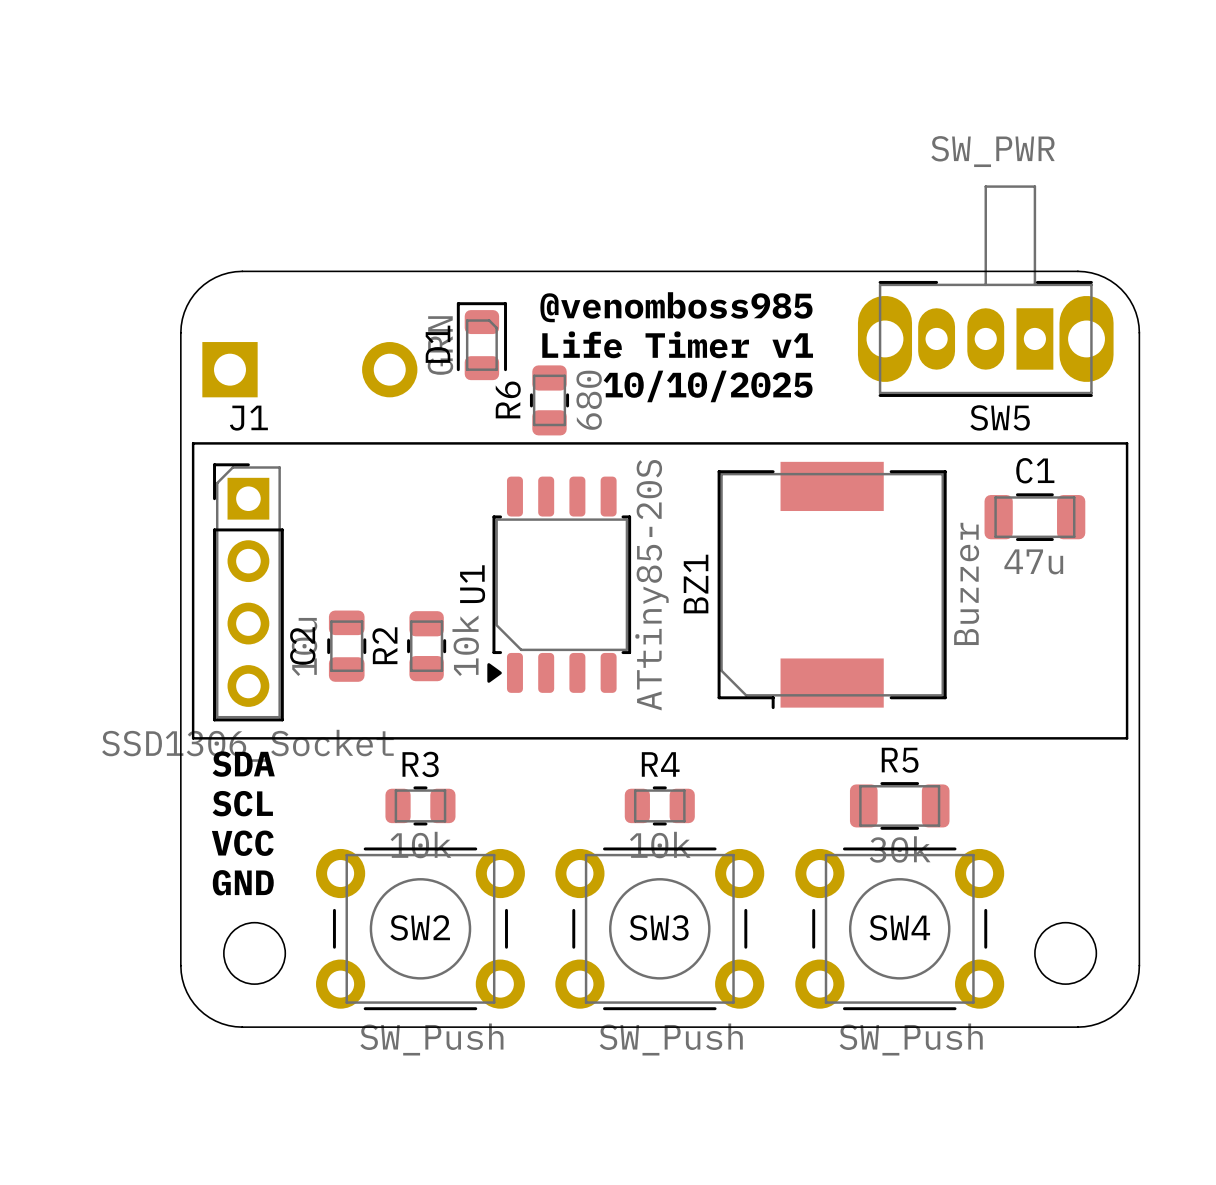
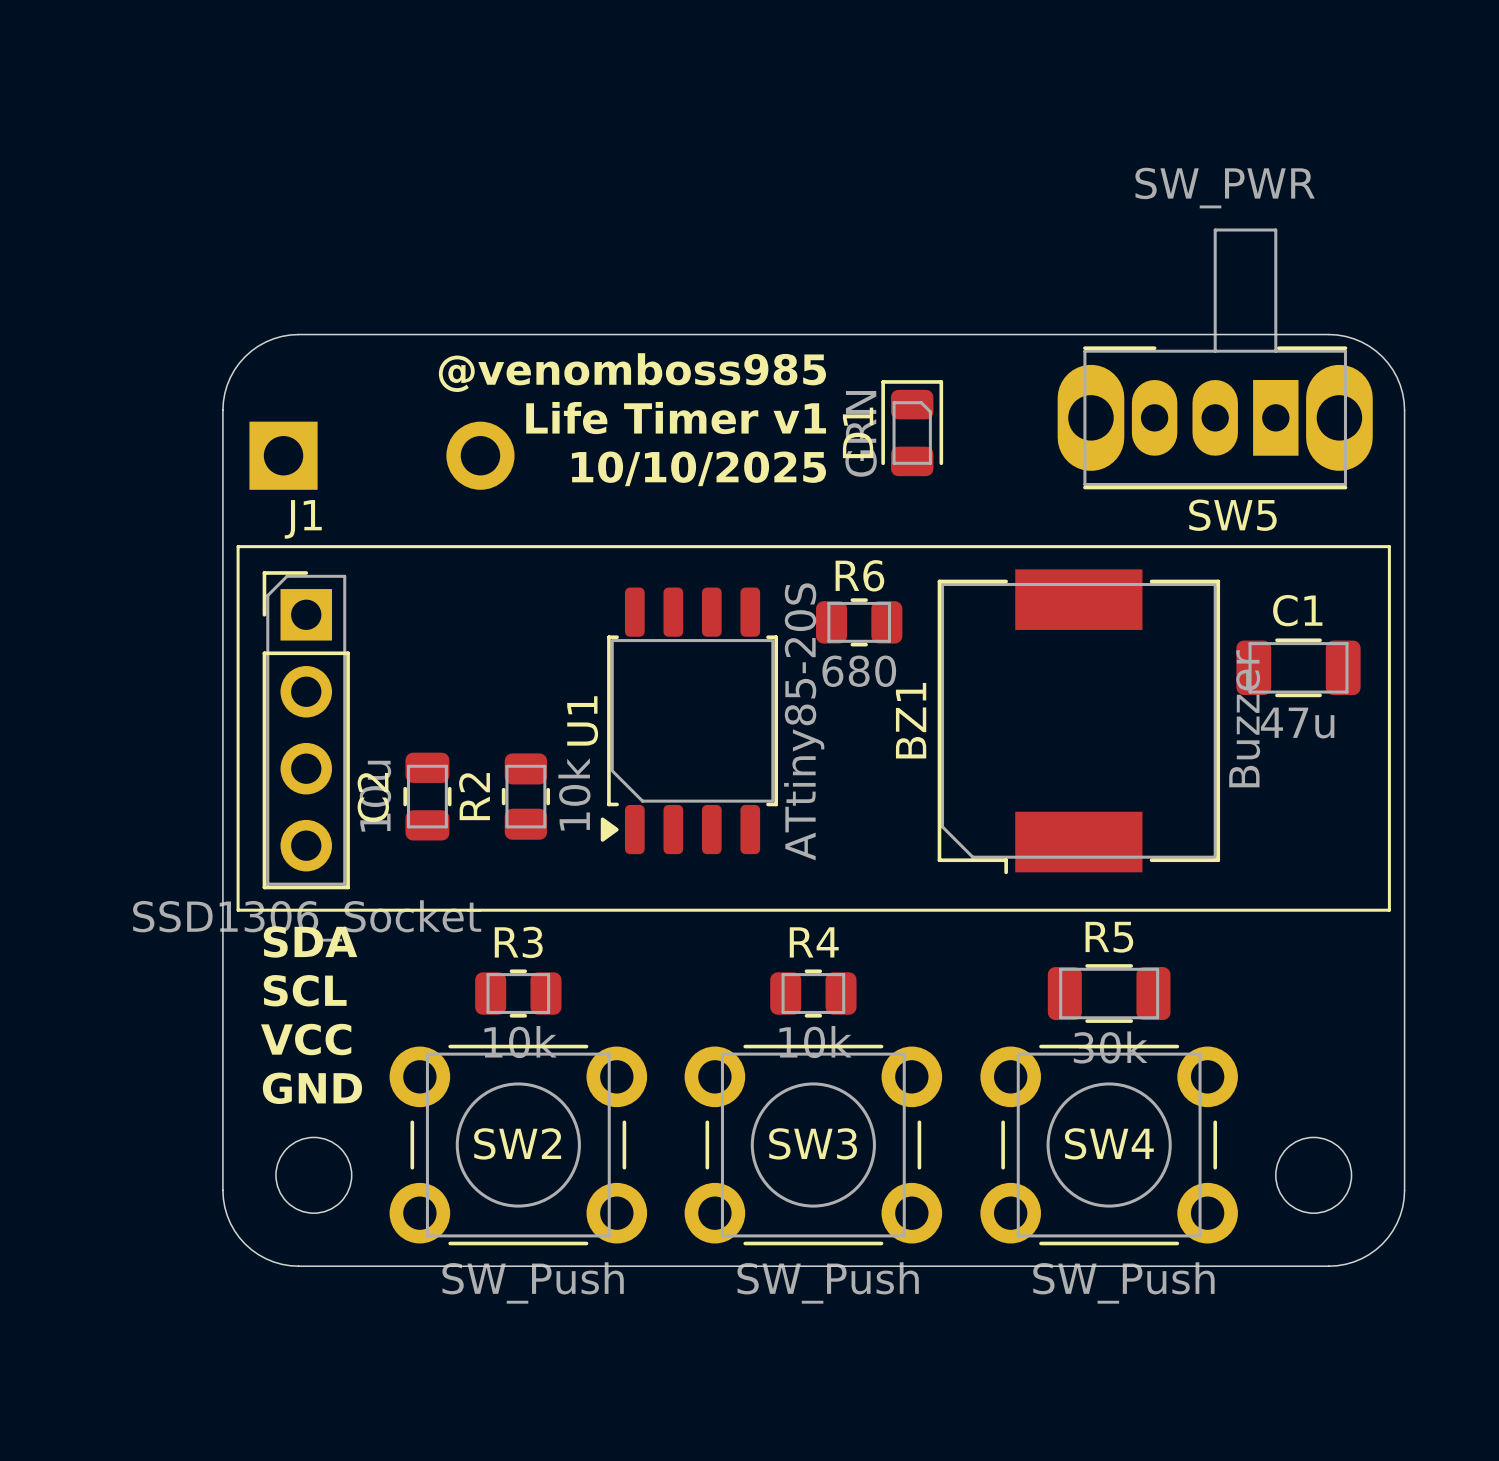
text position: @venomboss985 (676, 307) -> @venomboss985 (632, 372)
D1 position: (481, 341) -> (912, 428)
text position: Life Timer v1 (677, 344) -> Life Timer v1 (676, 418)
text position: 10/10/2025 (708, 386) -> 10/10/2025 (698, 468)
R6 rotation: 0° (549, 400) -> 90° clockwise (859, 622)
R6 position: (549, 400) -> (859, 622)
C1 position: (1034, 517) -> (1298, 667)
BZ1 position: (832, 585) -> (1078, 721)

